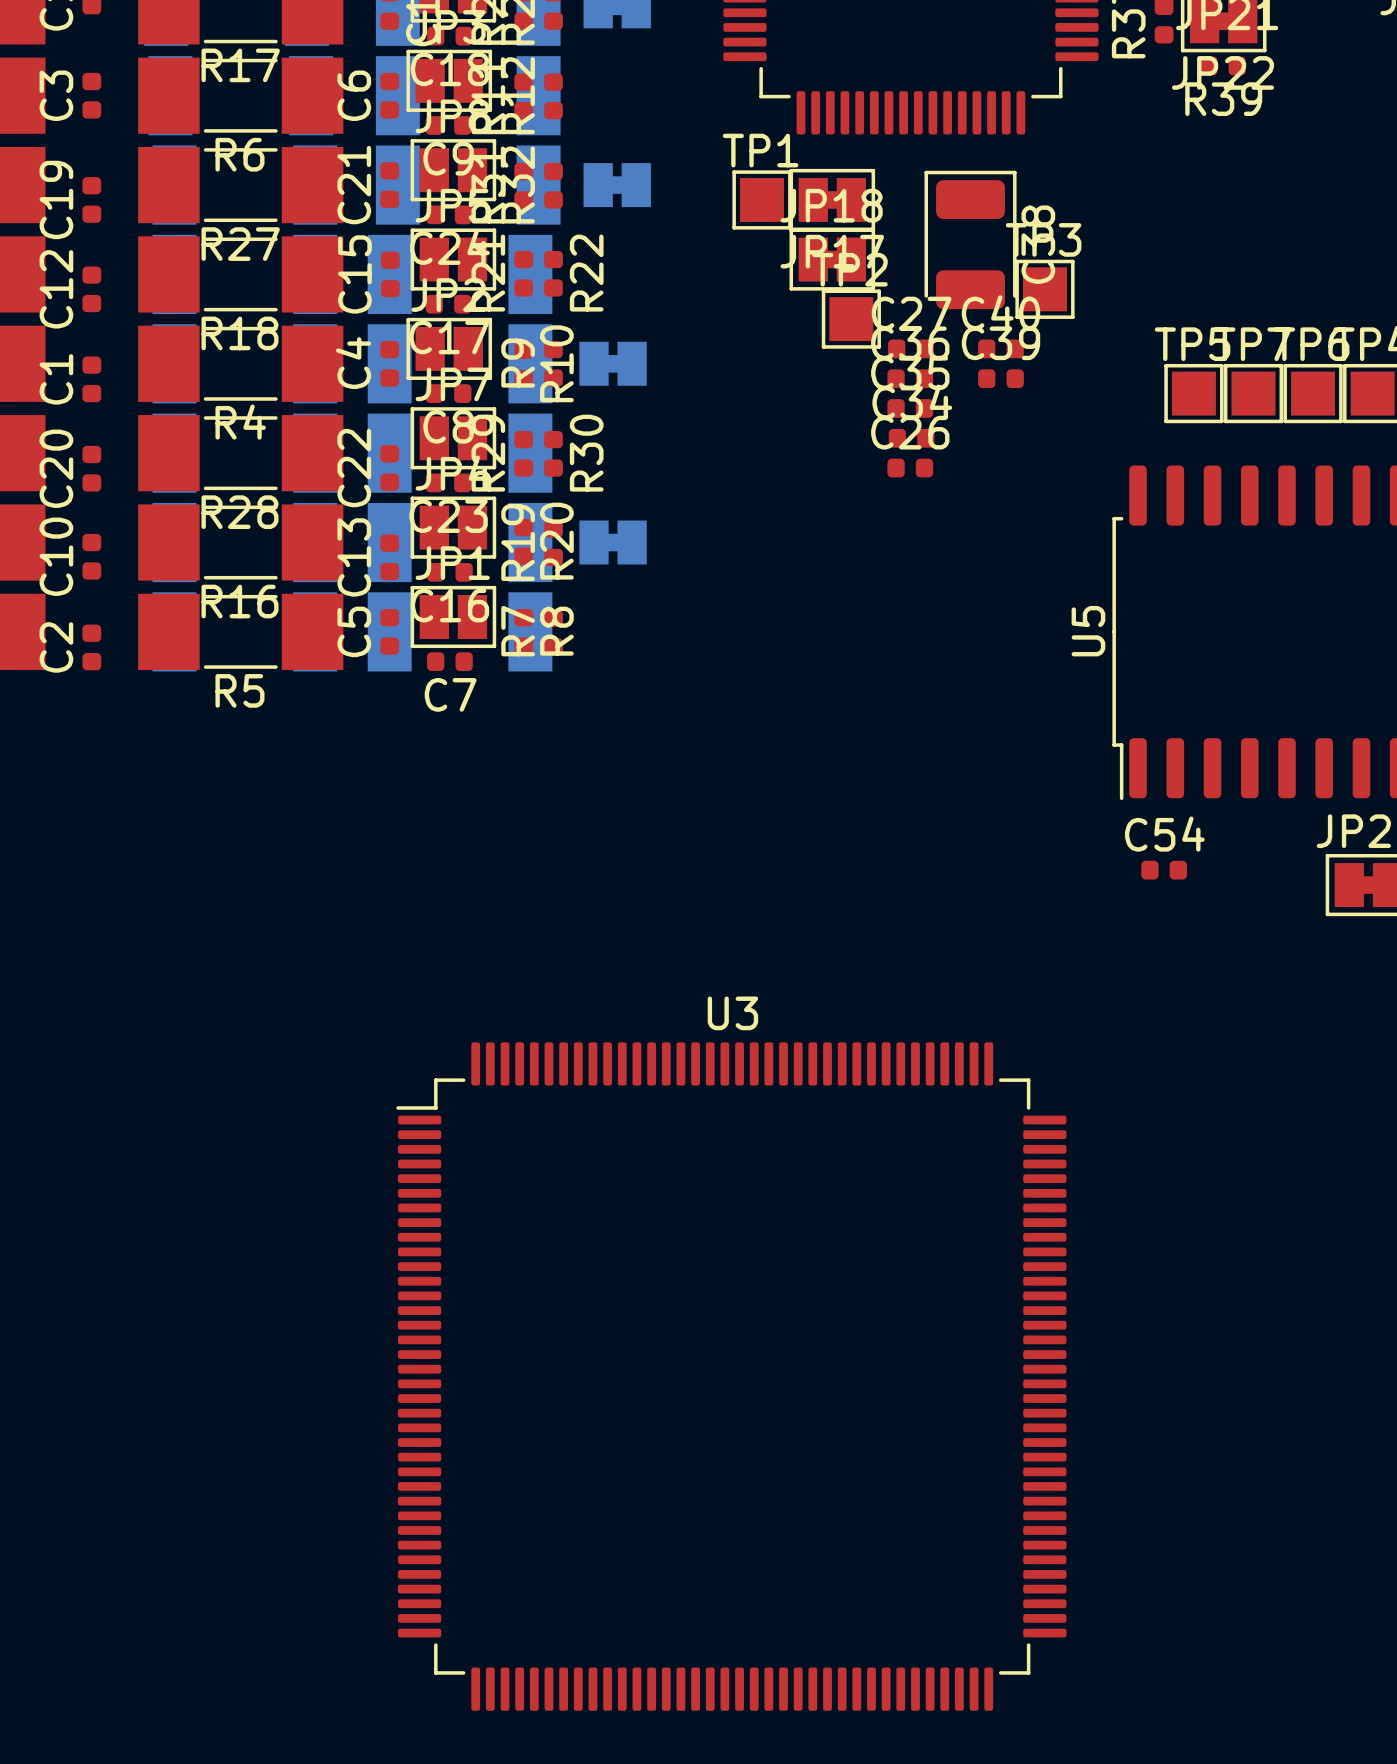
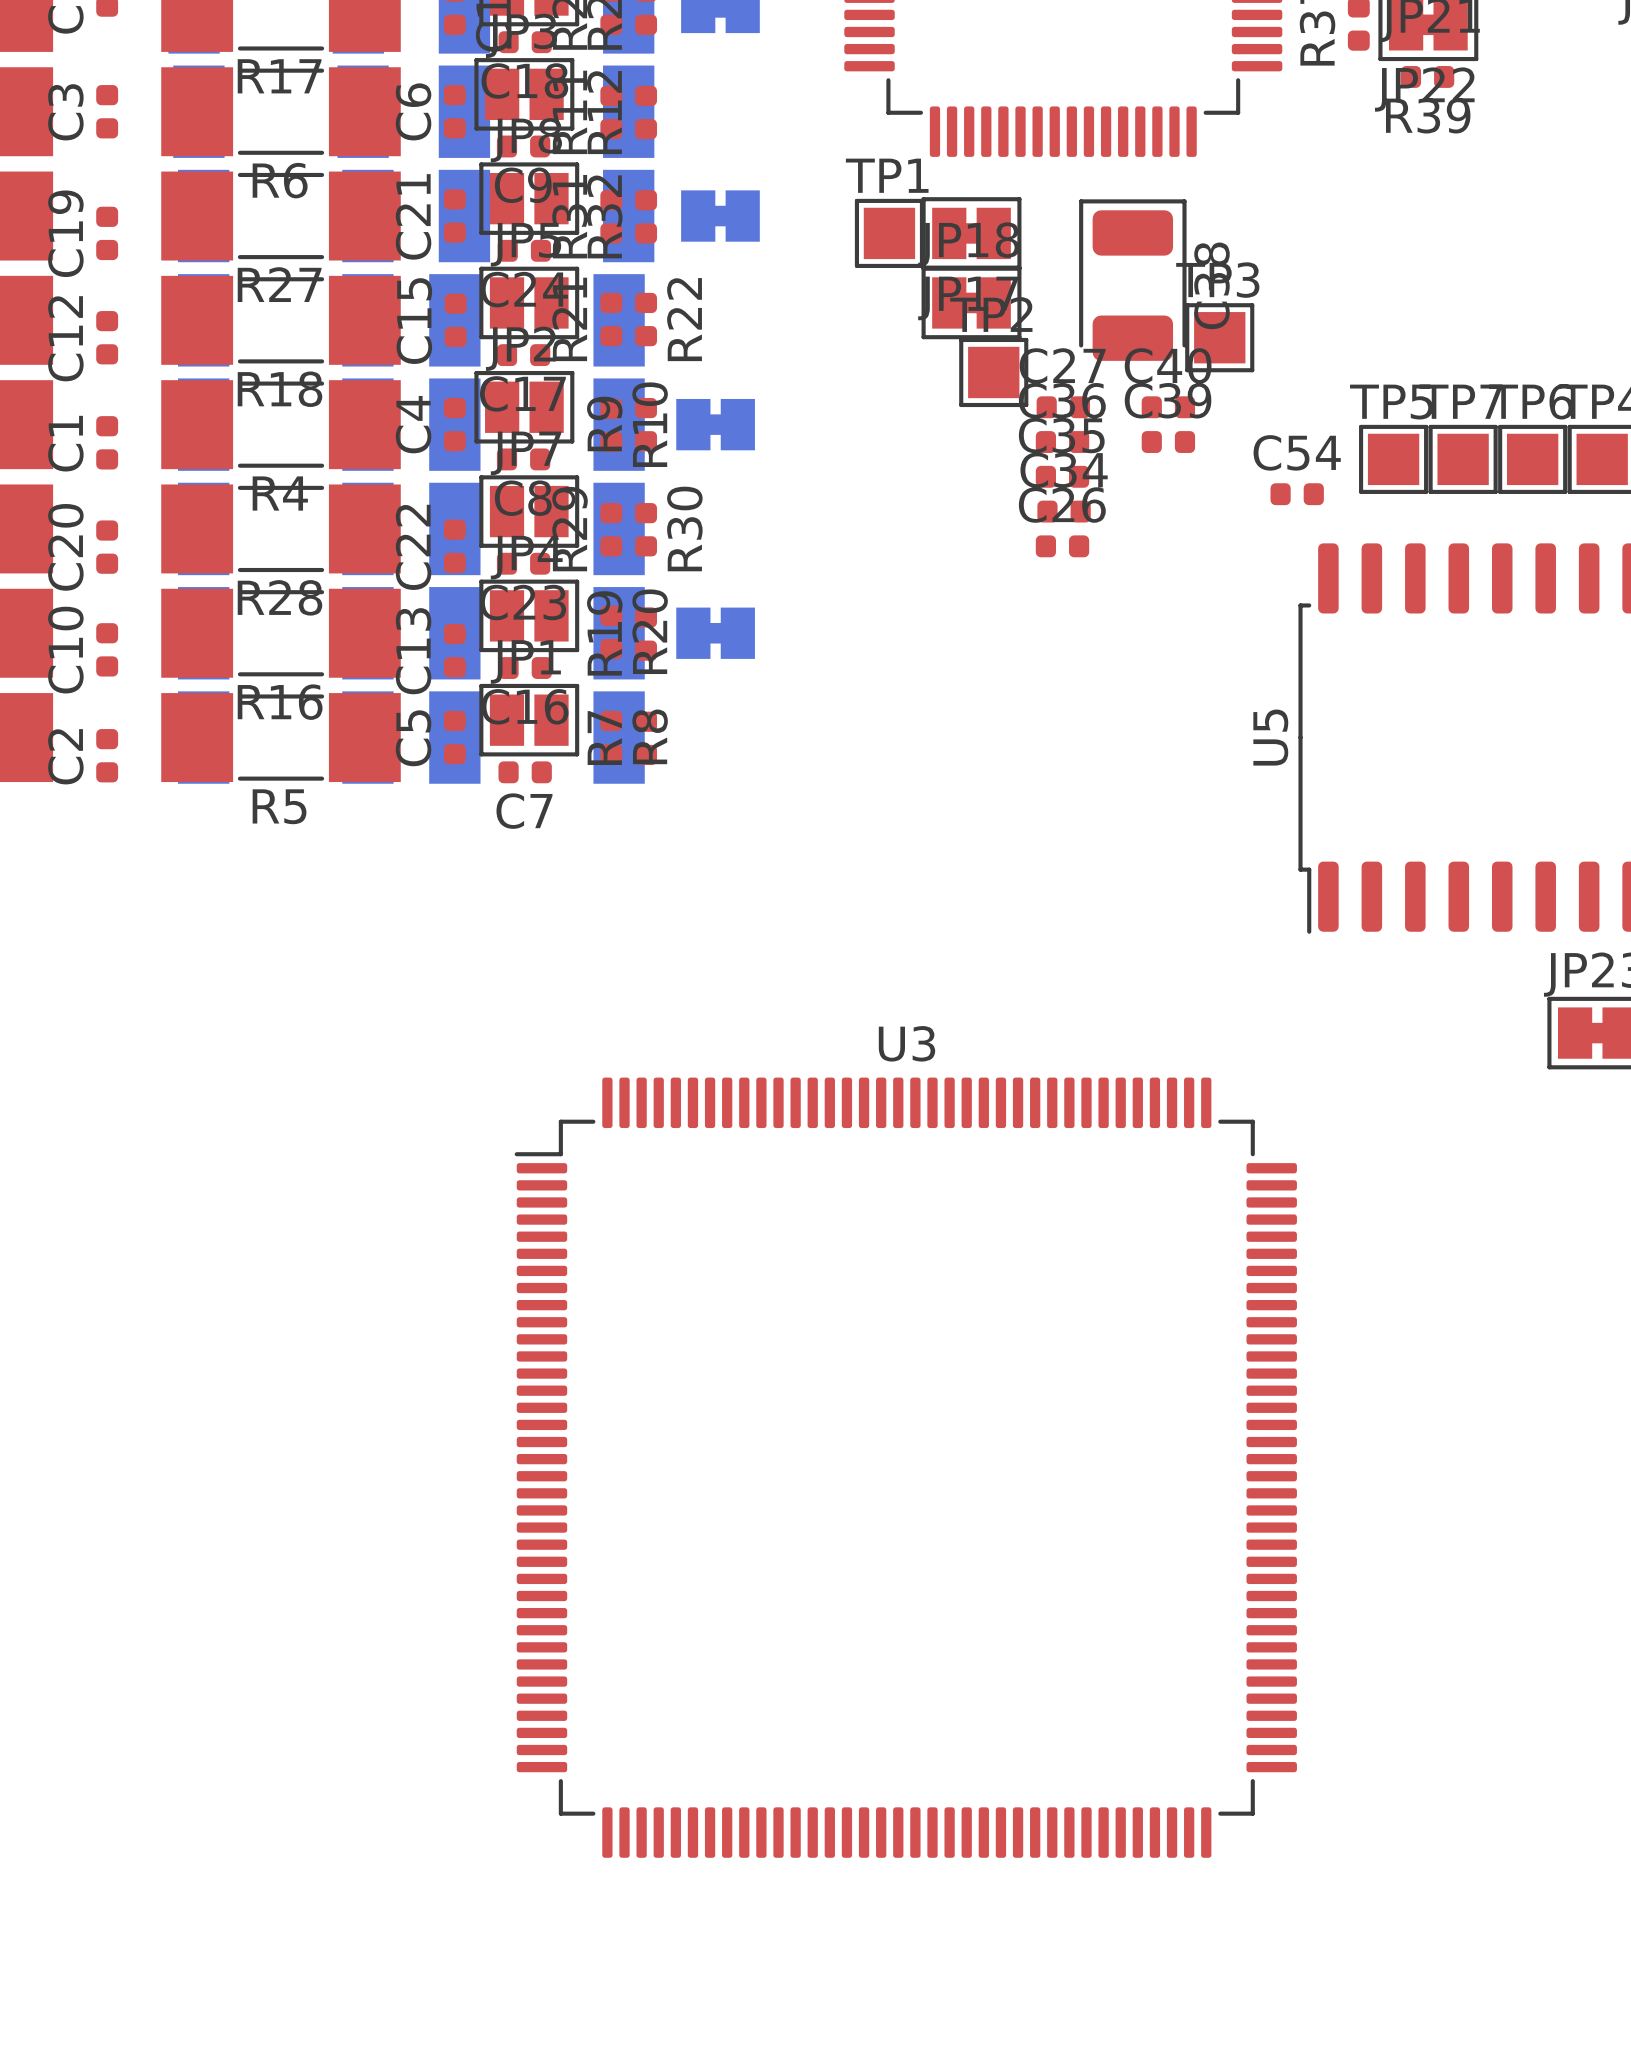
C54 position: (1164, 870) -> (1297, 494)
U3 position: (731, 1376) -> (905, 1467)

